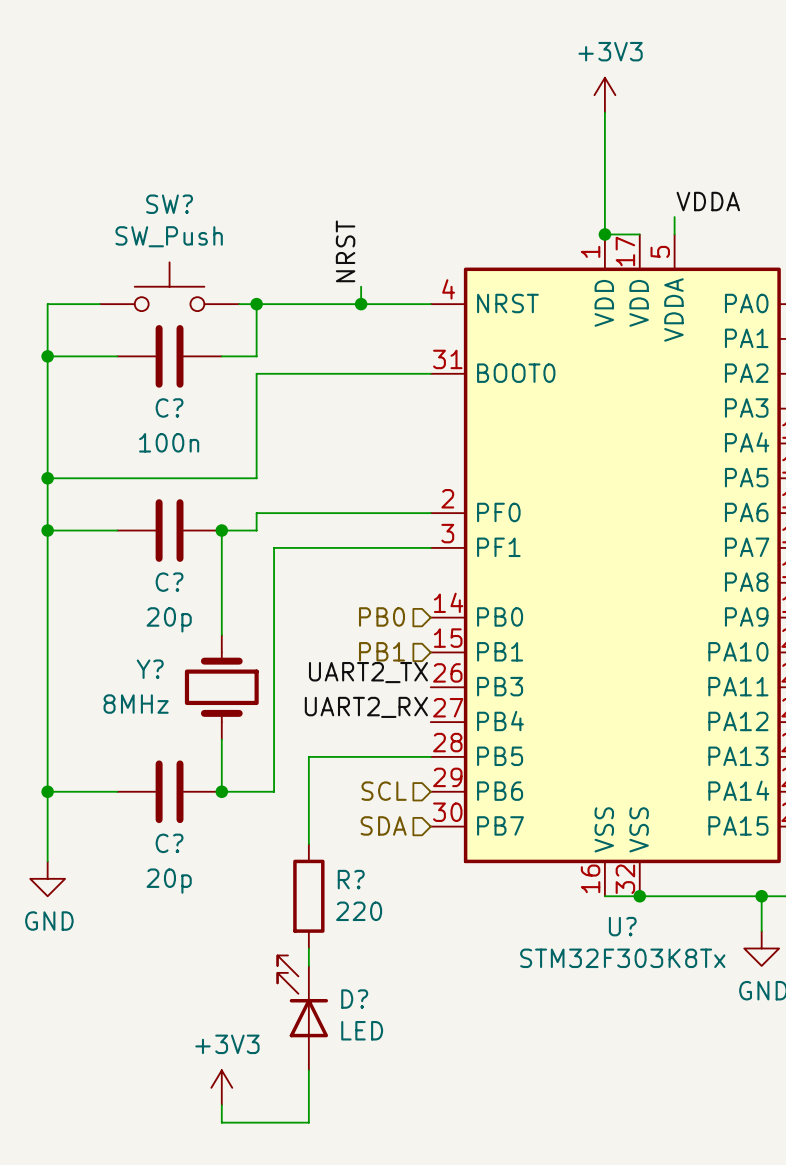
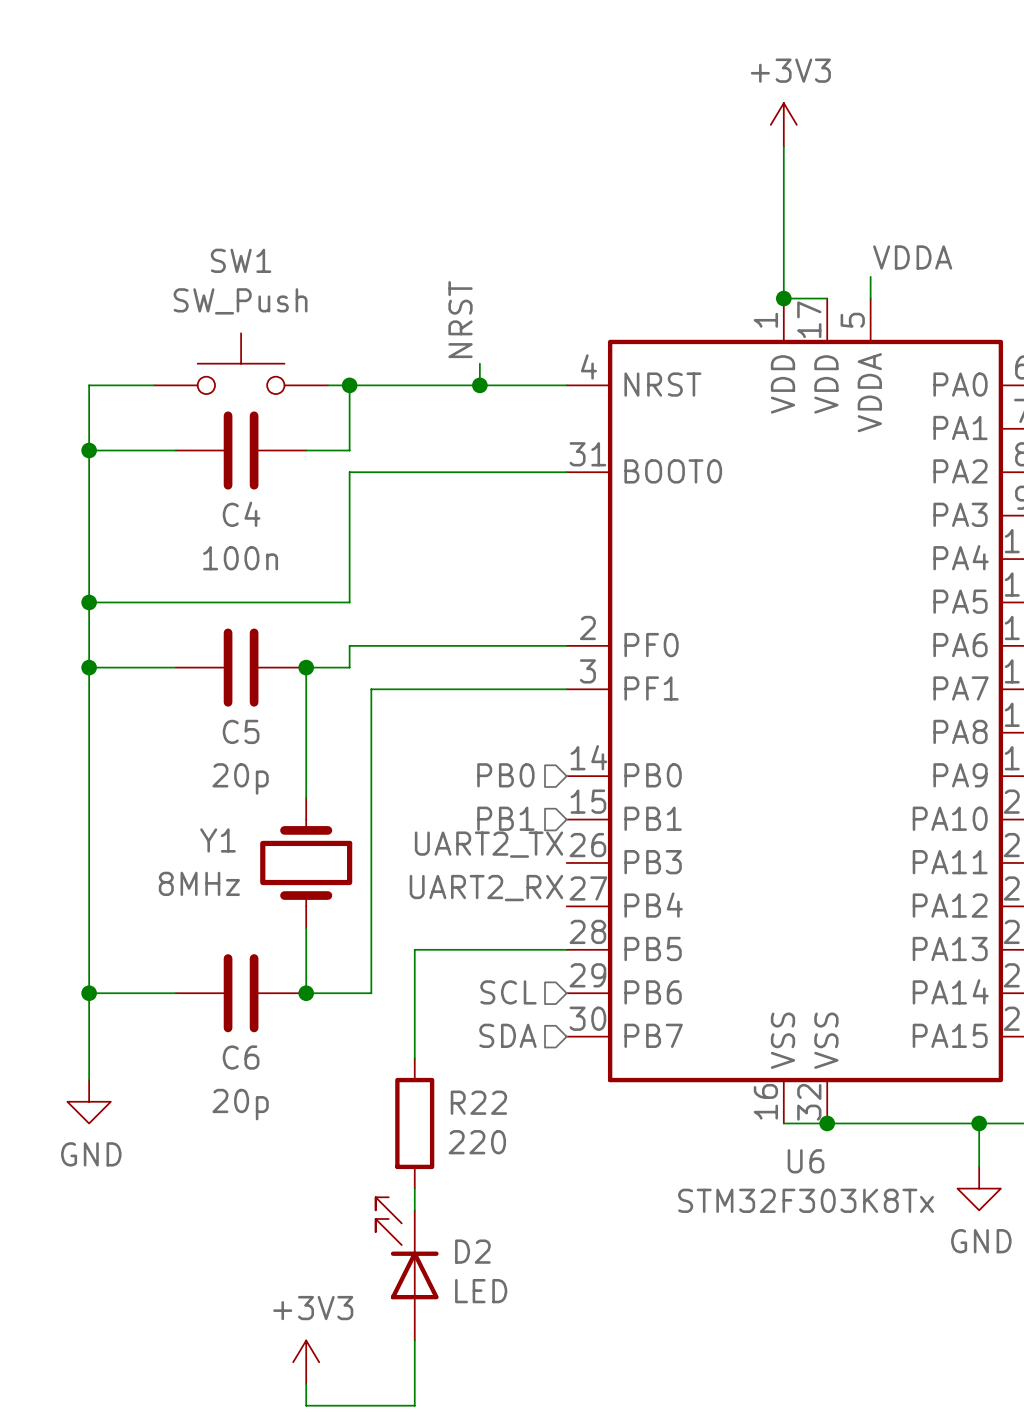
SW? name: SW? (169, 204) -> SW1 (241, 260)
C? name: C? (169, 407) -> C4 (241, 514)
C? name: C? (169, 582) -> C5 (241, 731)
Y? name: Y? (150, 669) -> Y1 (217, 840)
C? name: C? (169, 843) -> C6 (241, 1057)
R? name: R? (351, 879) -> R22 (478, 1102)
U? name: U? (622, 926) -> U6 (806, 1161)
D? name: D? (354, 999) -> D2 (472, 1251)

